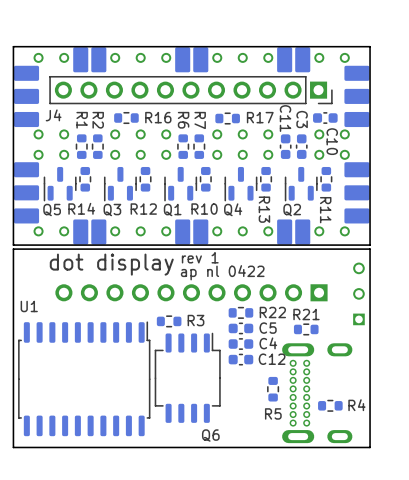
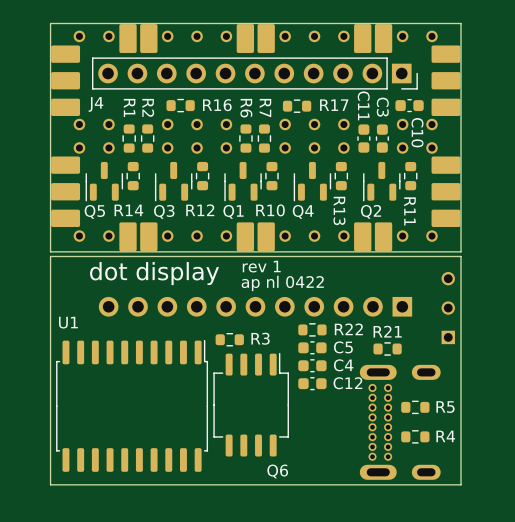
R5 rotation: 0° (273, 389) -> 90° clockwise (415, 407)
R5 position: (273, 389) -> (415, 407)
R5 name position: R5 (273, 413) -> R5 (445, 407)

